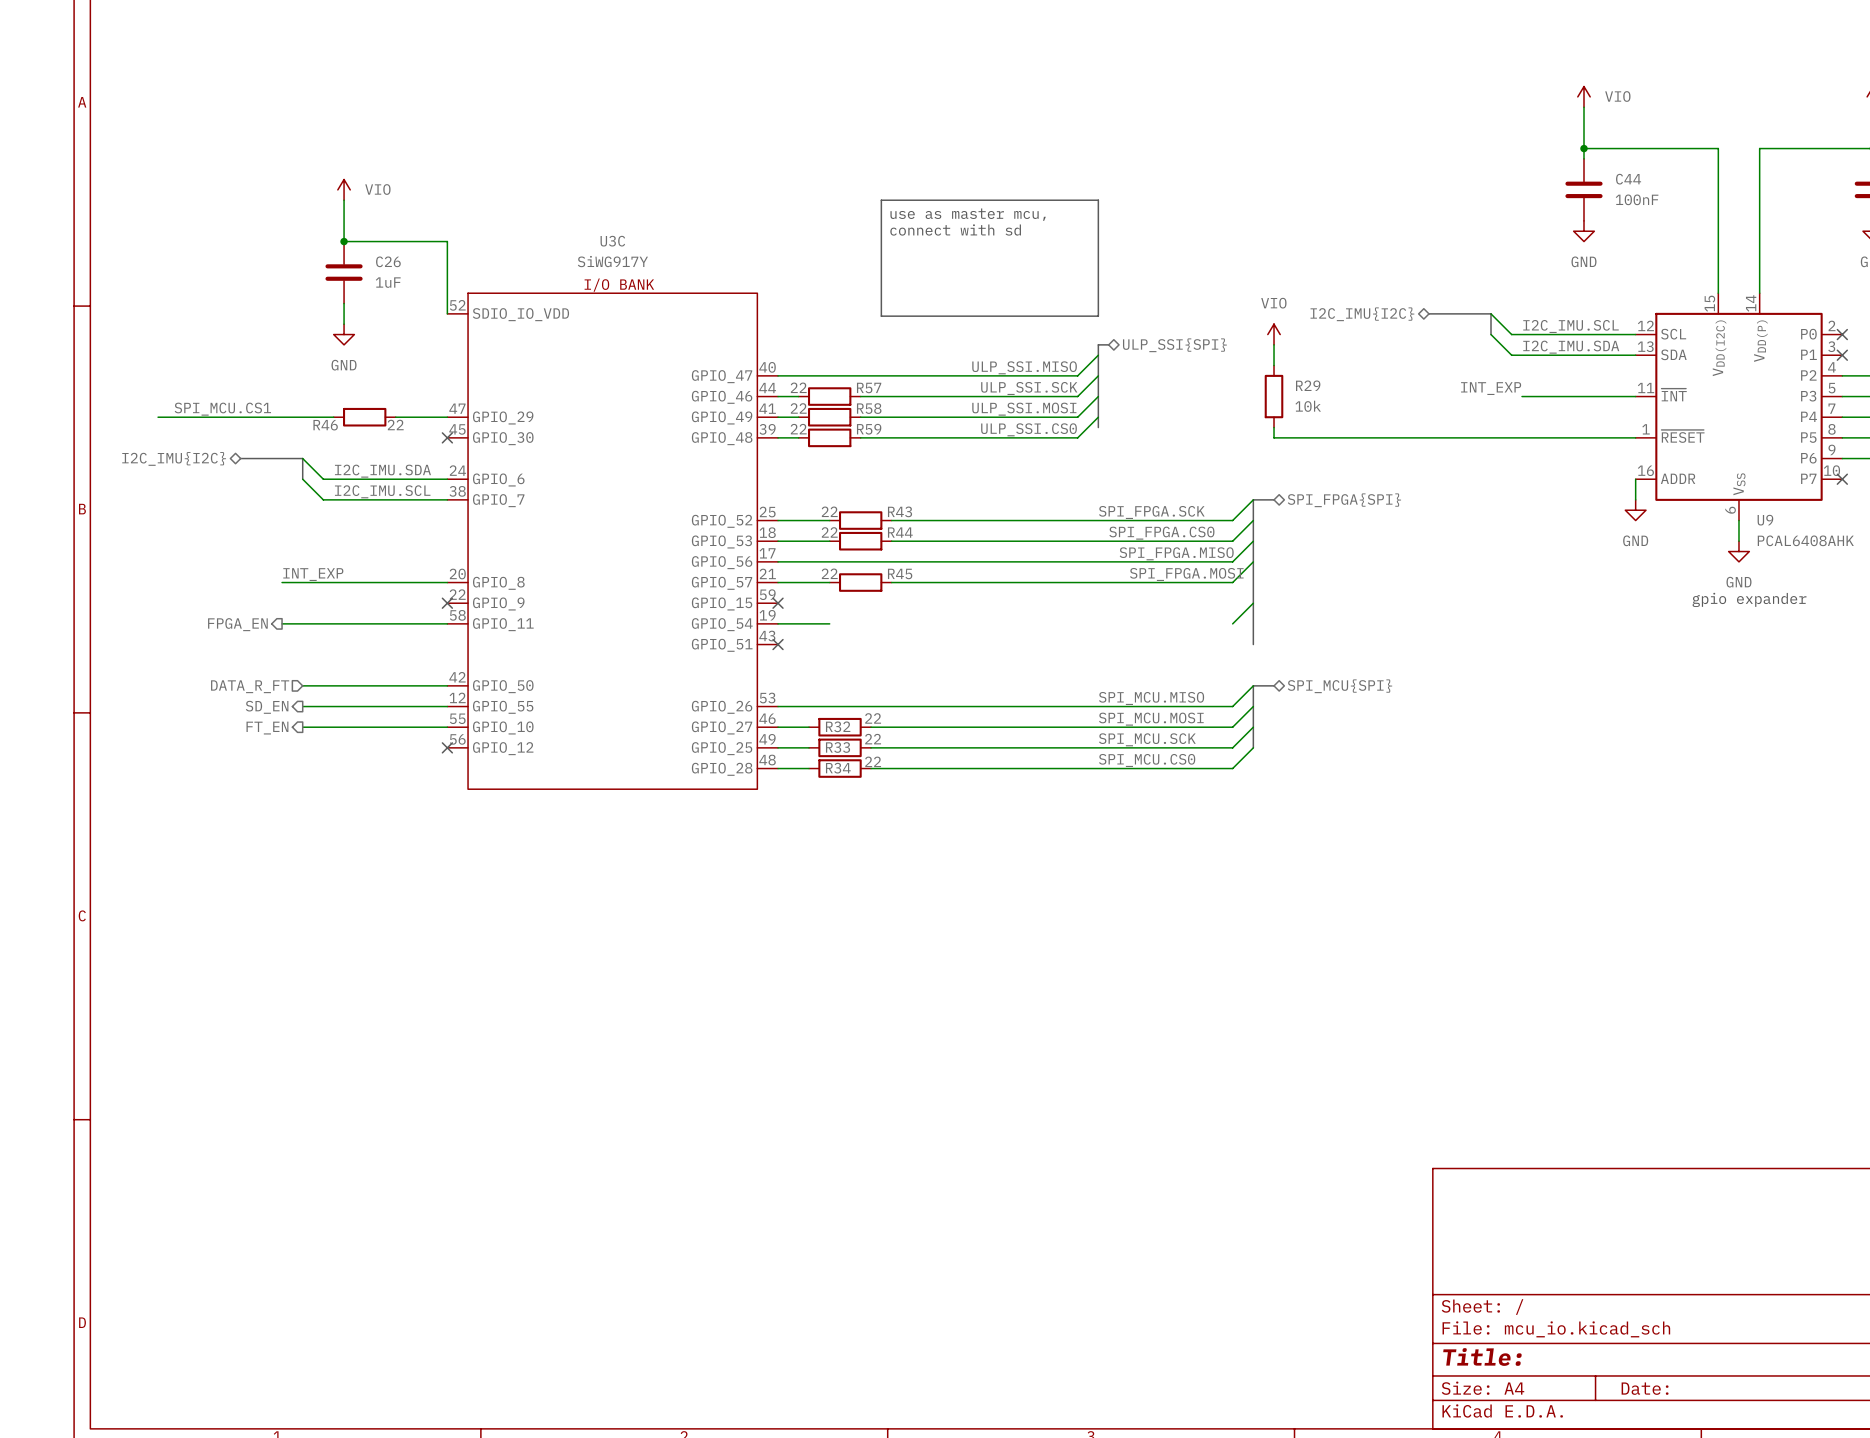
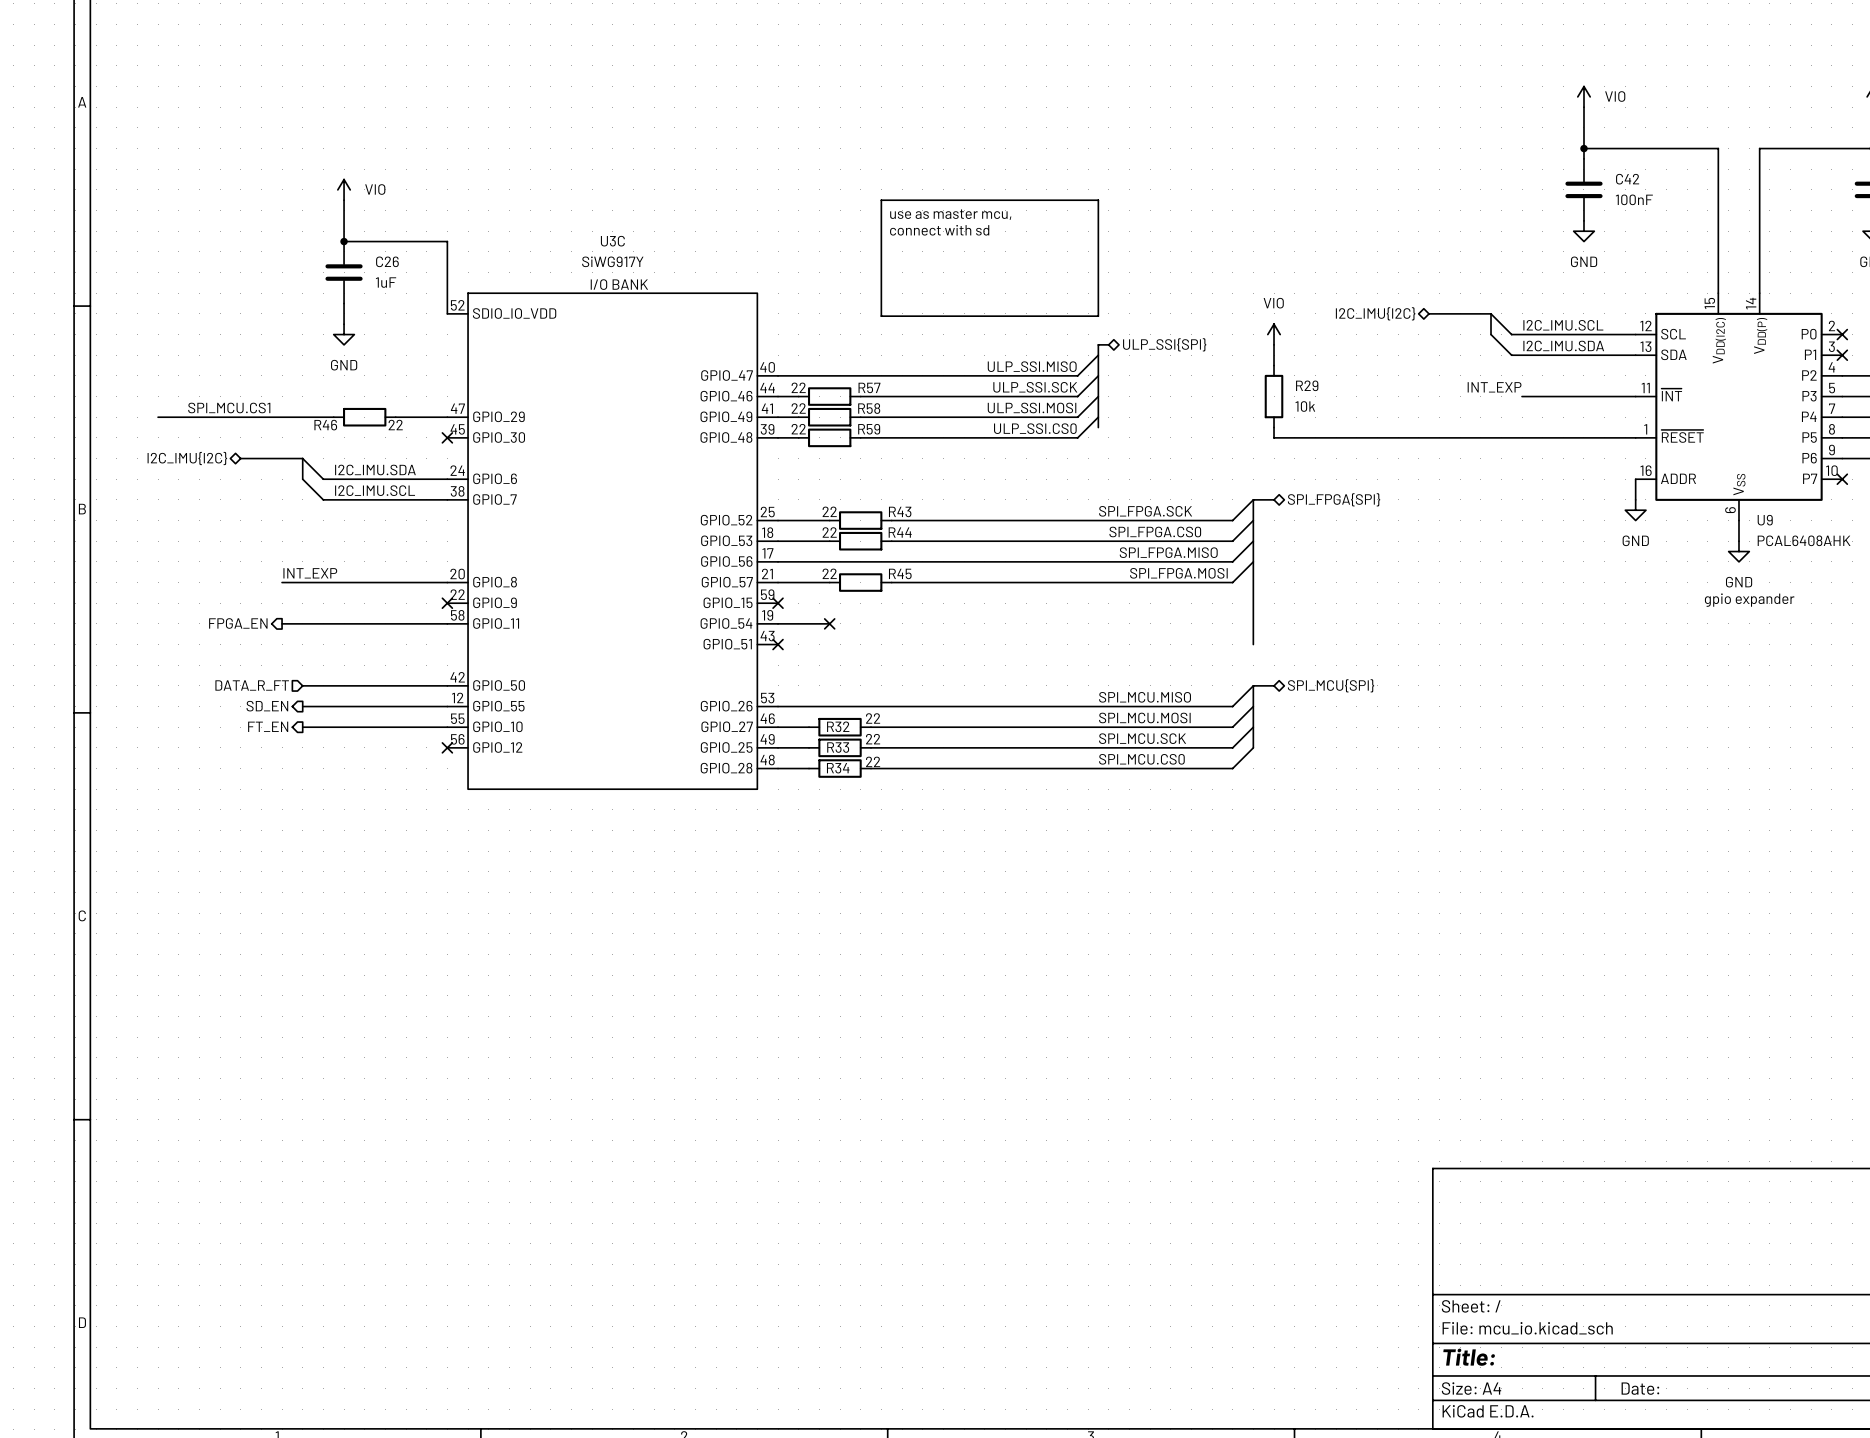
C44 name: C44 (1628, 179) -> C42 (1627, 179)
wire: (1253, 603) (1232, 623) -> none
no-connect mark: none -> (829, 623)

